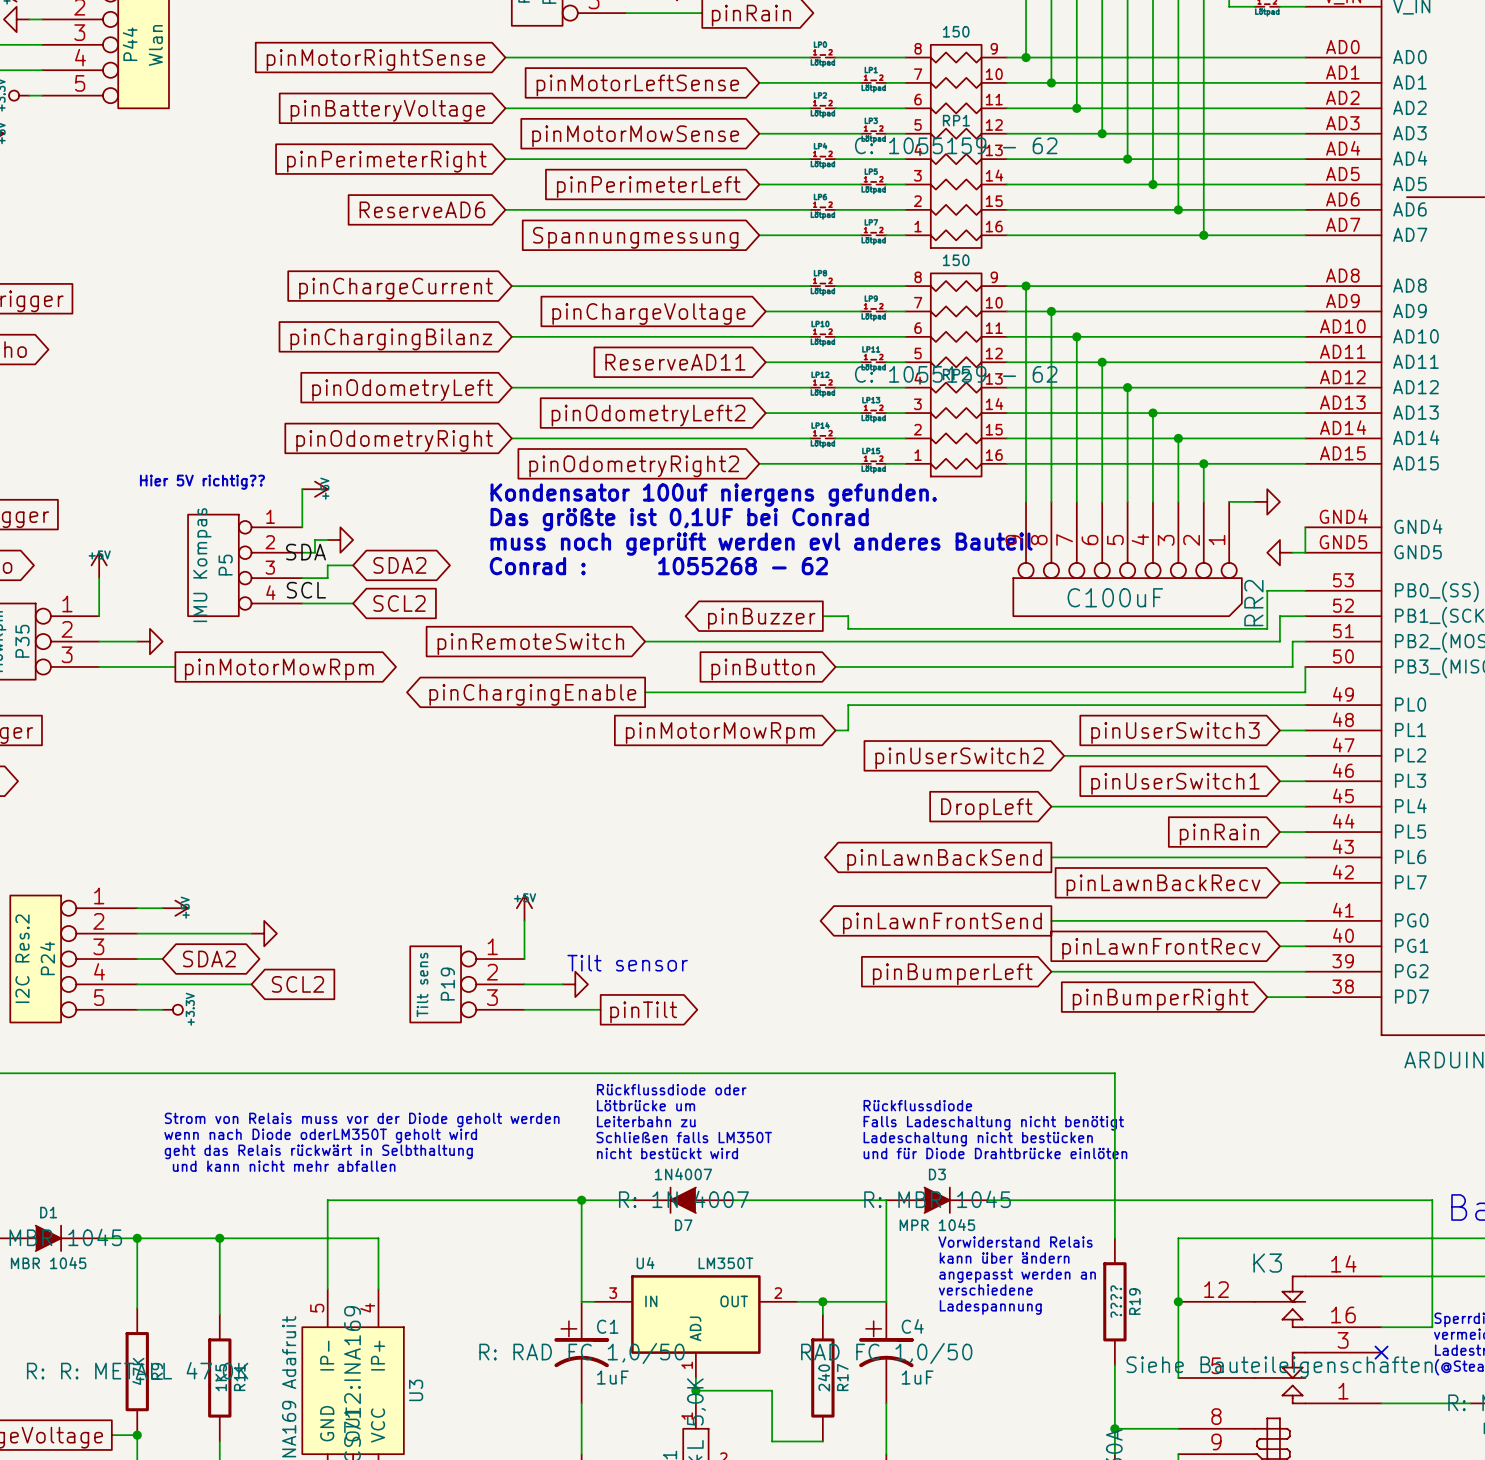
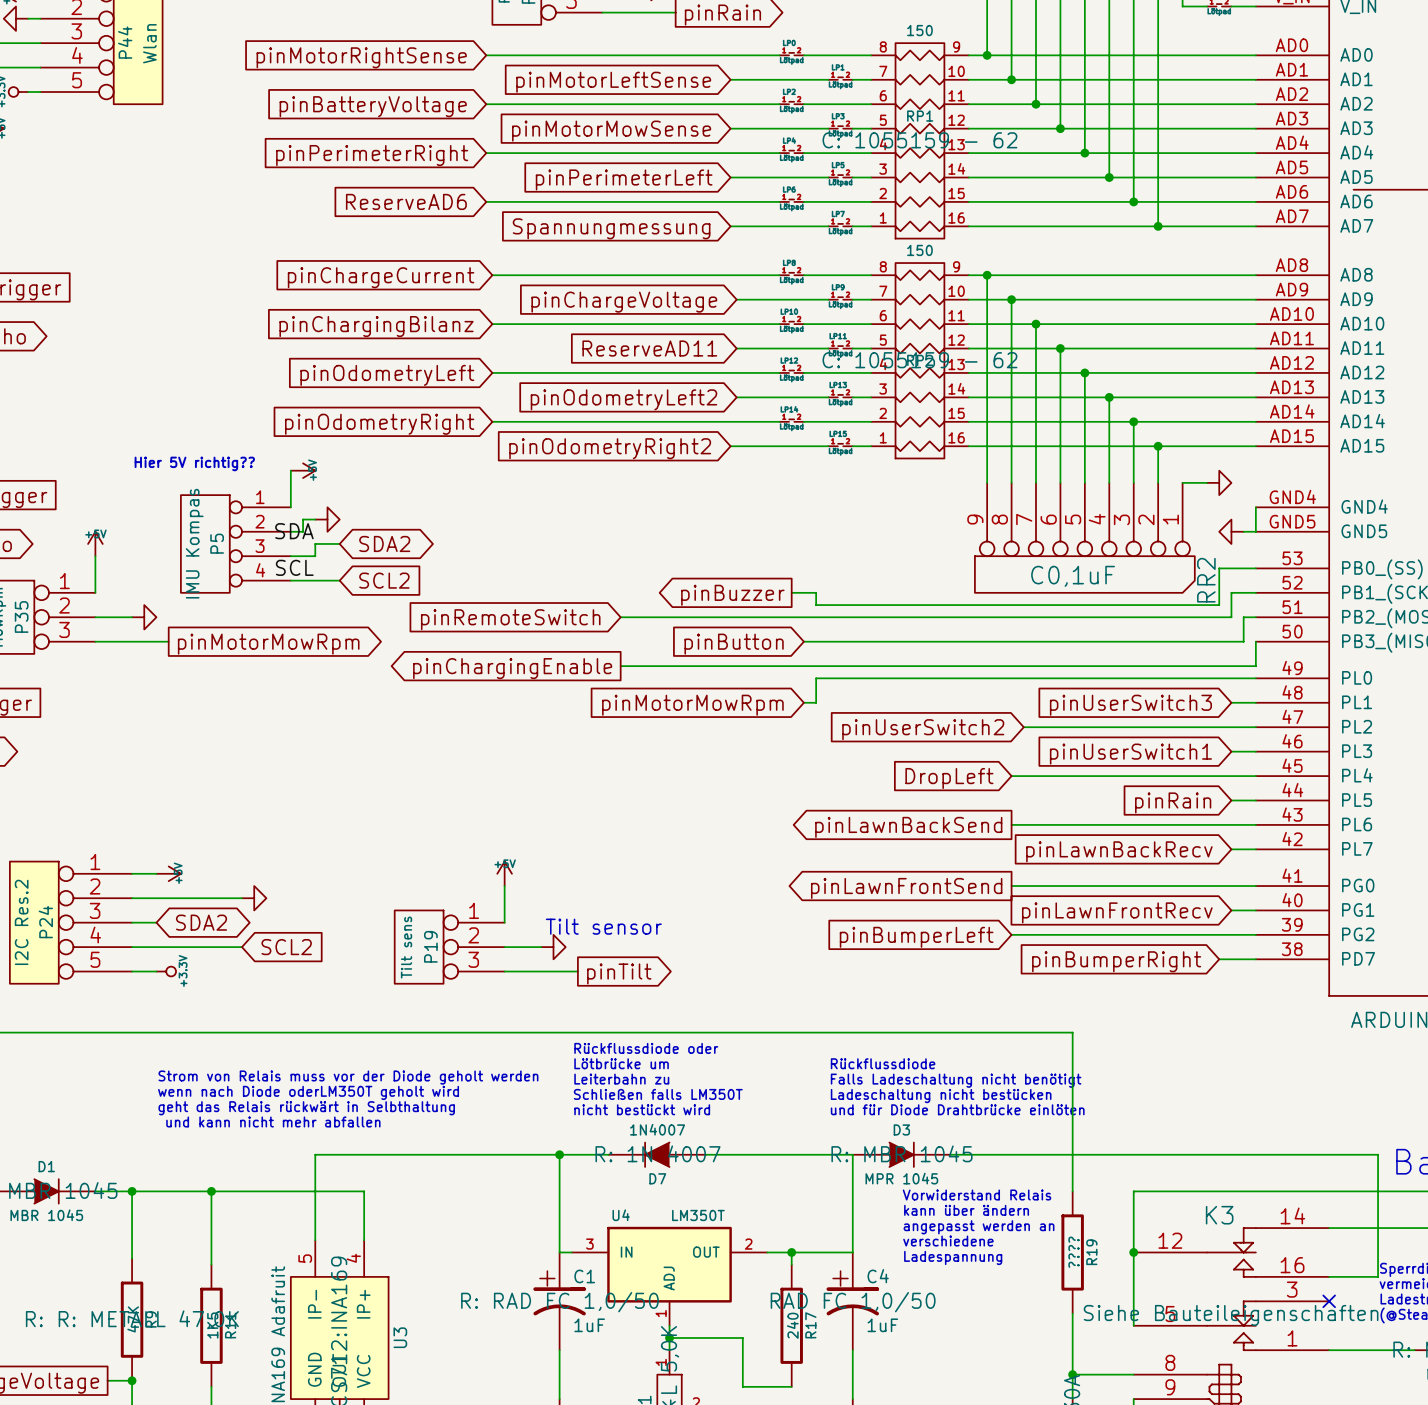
text: Kondensator 100uf niergens gefunden. (713, 495) -> none
text: Das größte ist 0,1UF bei Conrad (679, 519) -> none
text: muss noch geprüft werden evl anderes Bauteil (761, 544) -> none
text: Conrad : 1055268 - 62 (658, 566) -> none
RR2 value: C100uF (1115, 597) -> C0,1uF (1073, 576)

